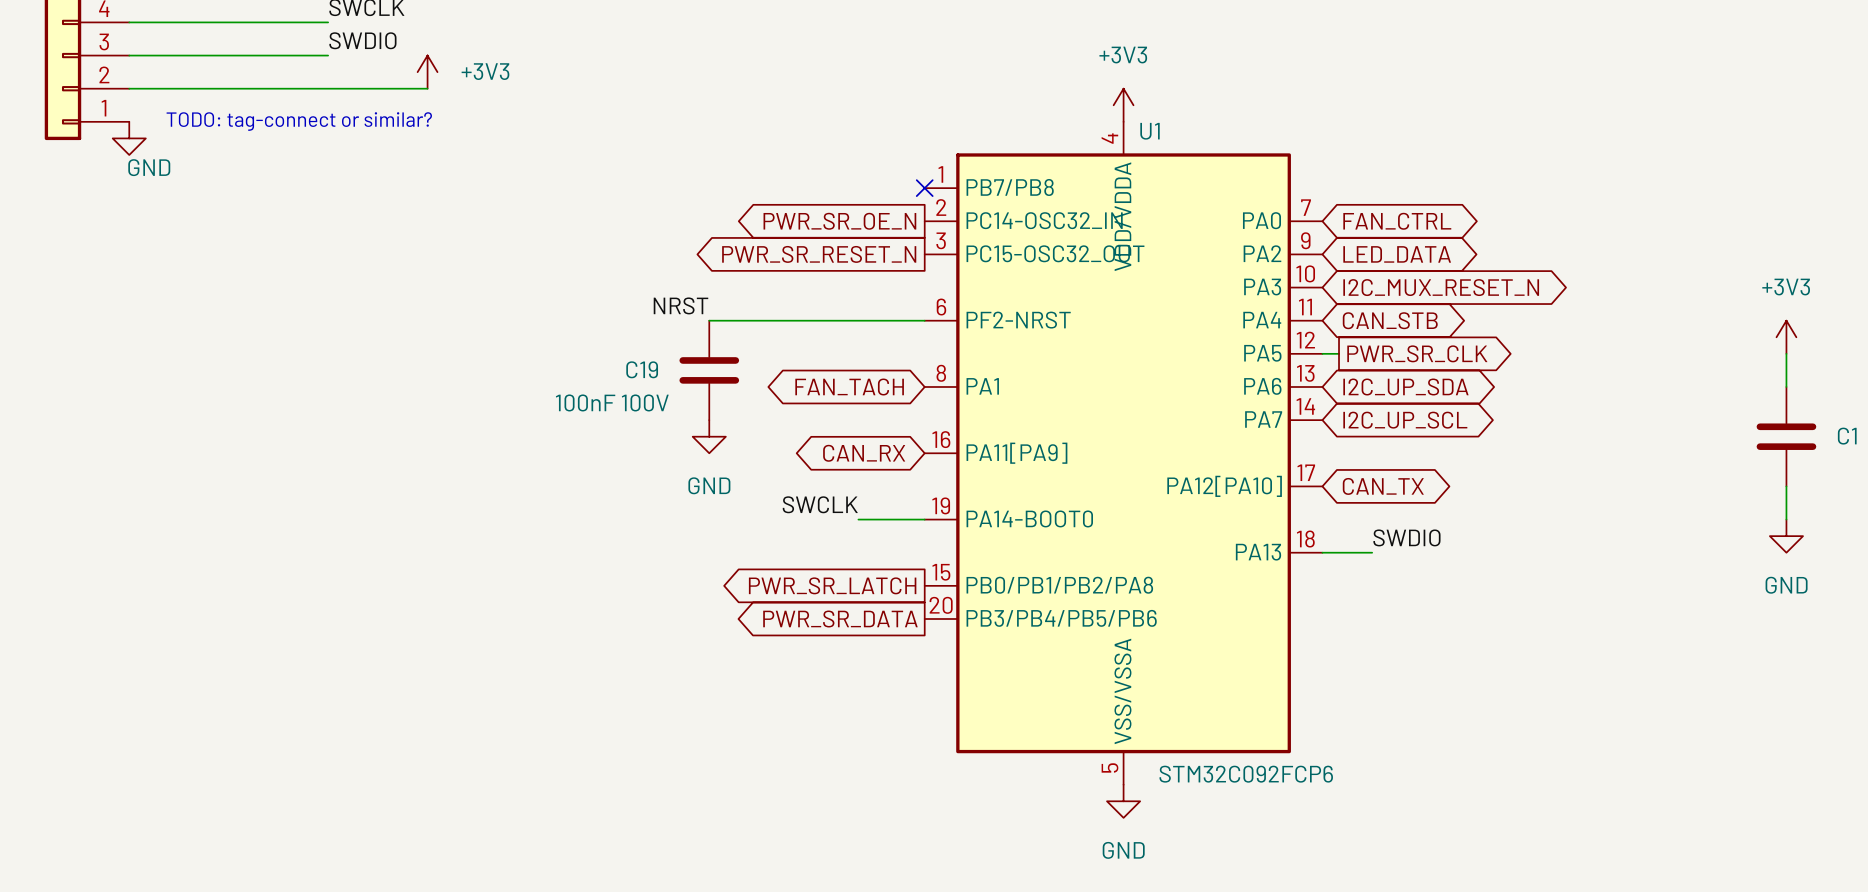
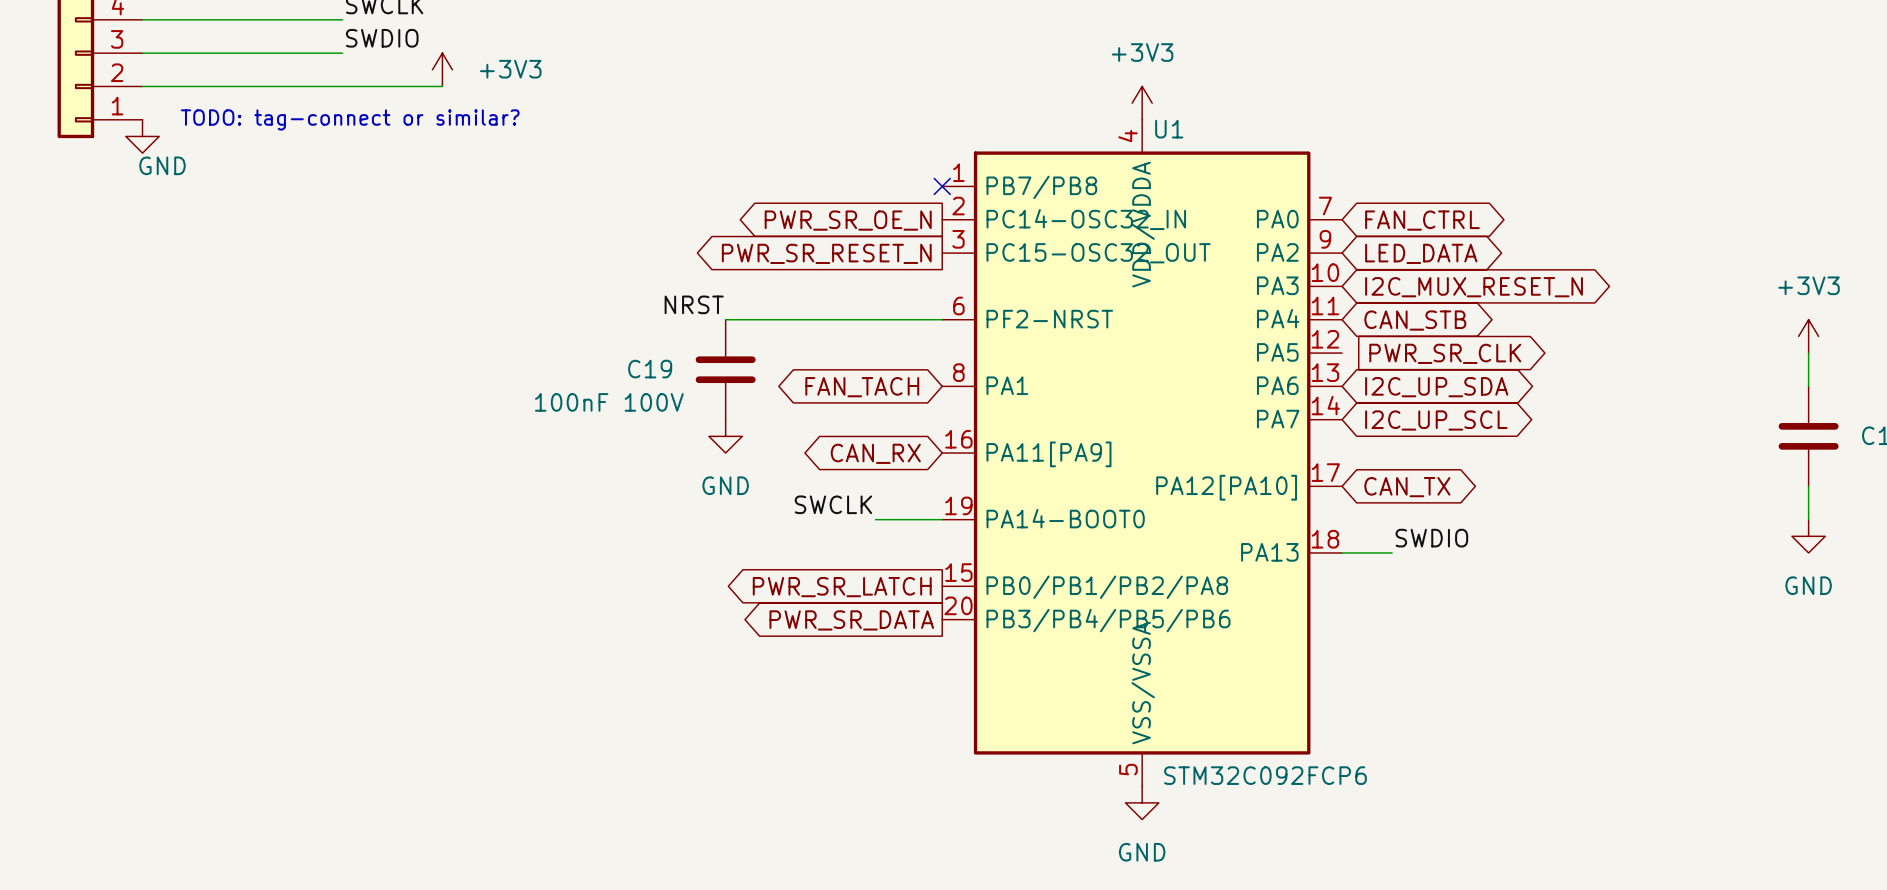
wire: (1322, 353) (1339, 353) -> none

